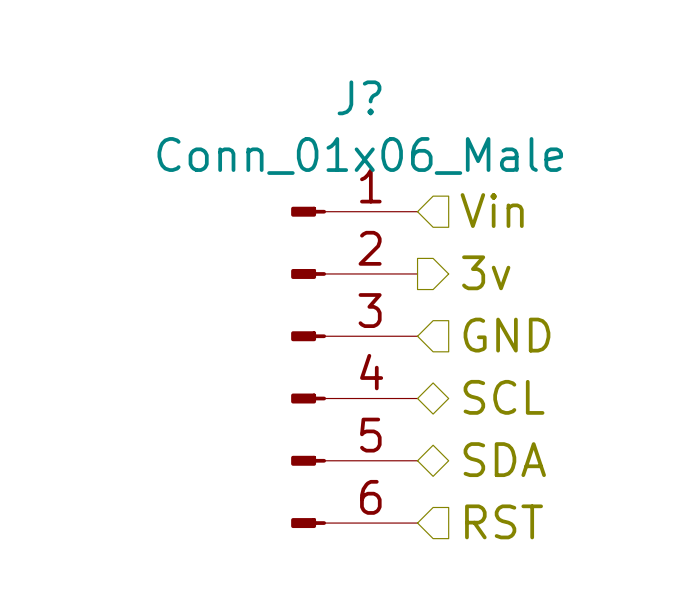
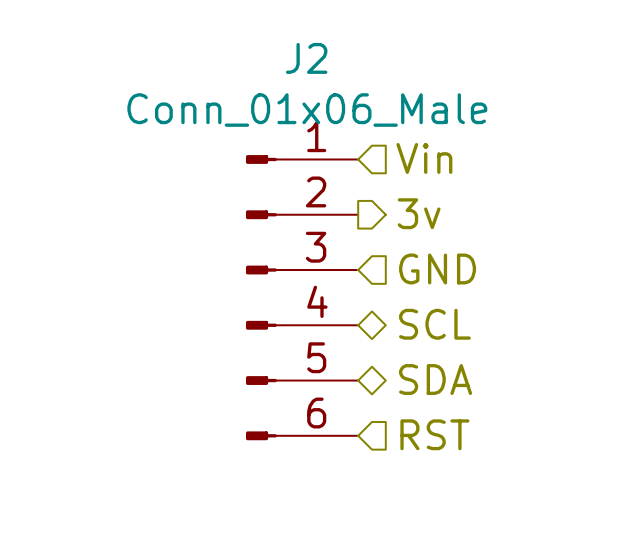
J? name: J? (359, 97) -> J2 (306, 58)

